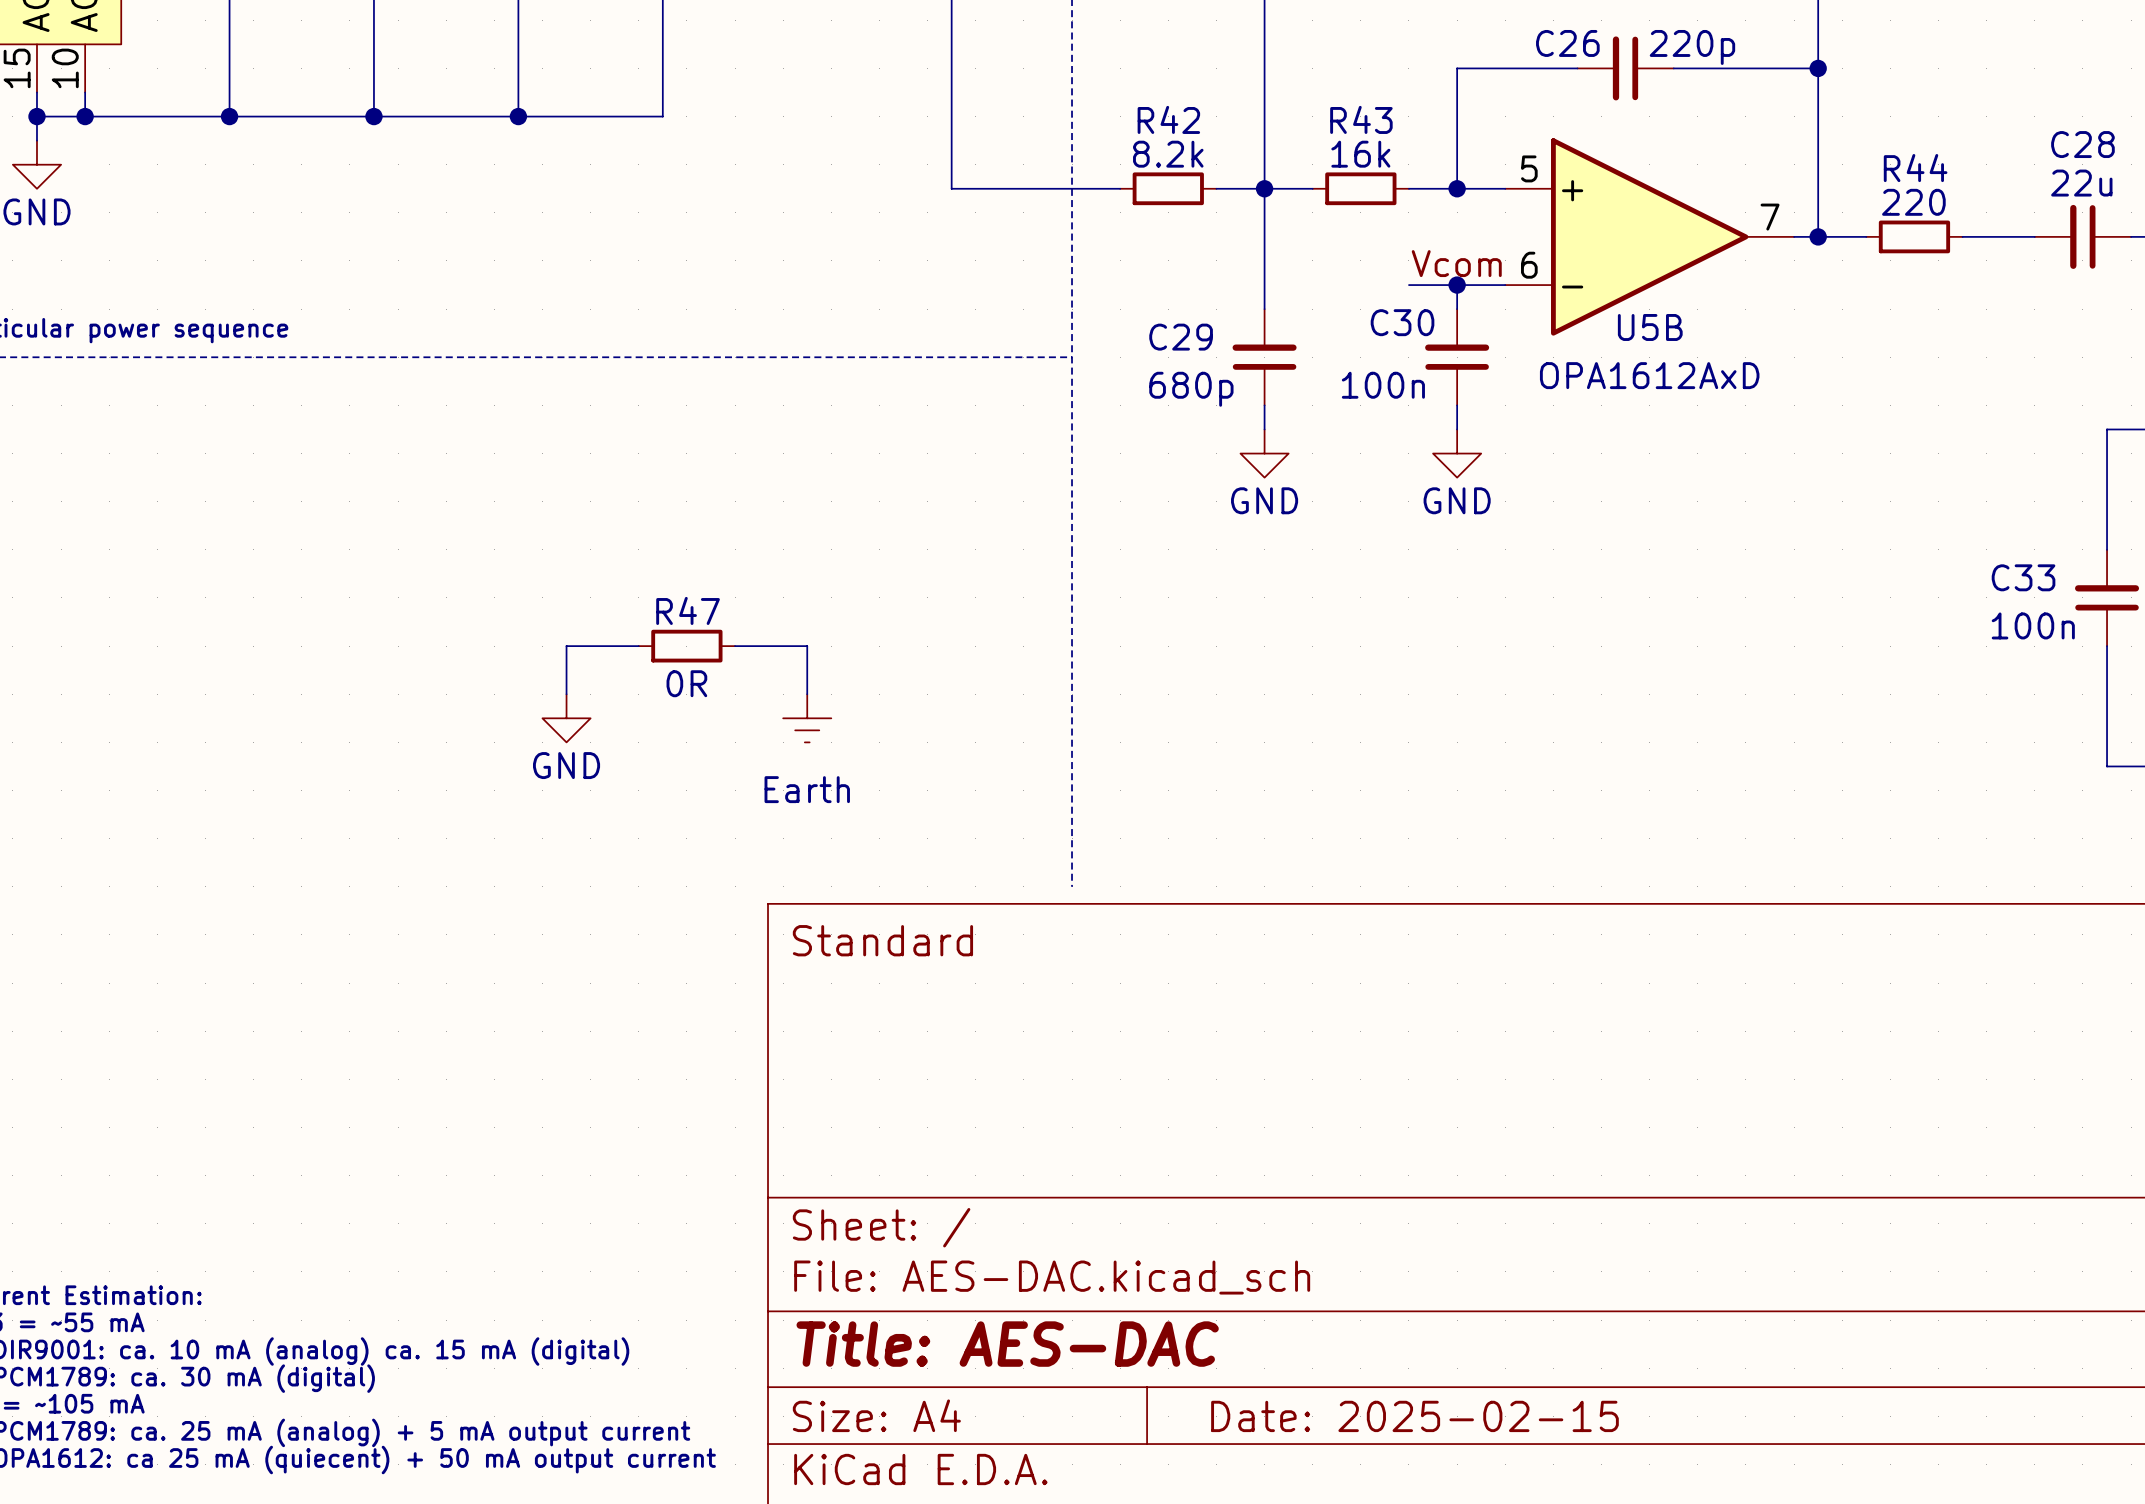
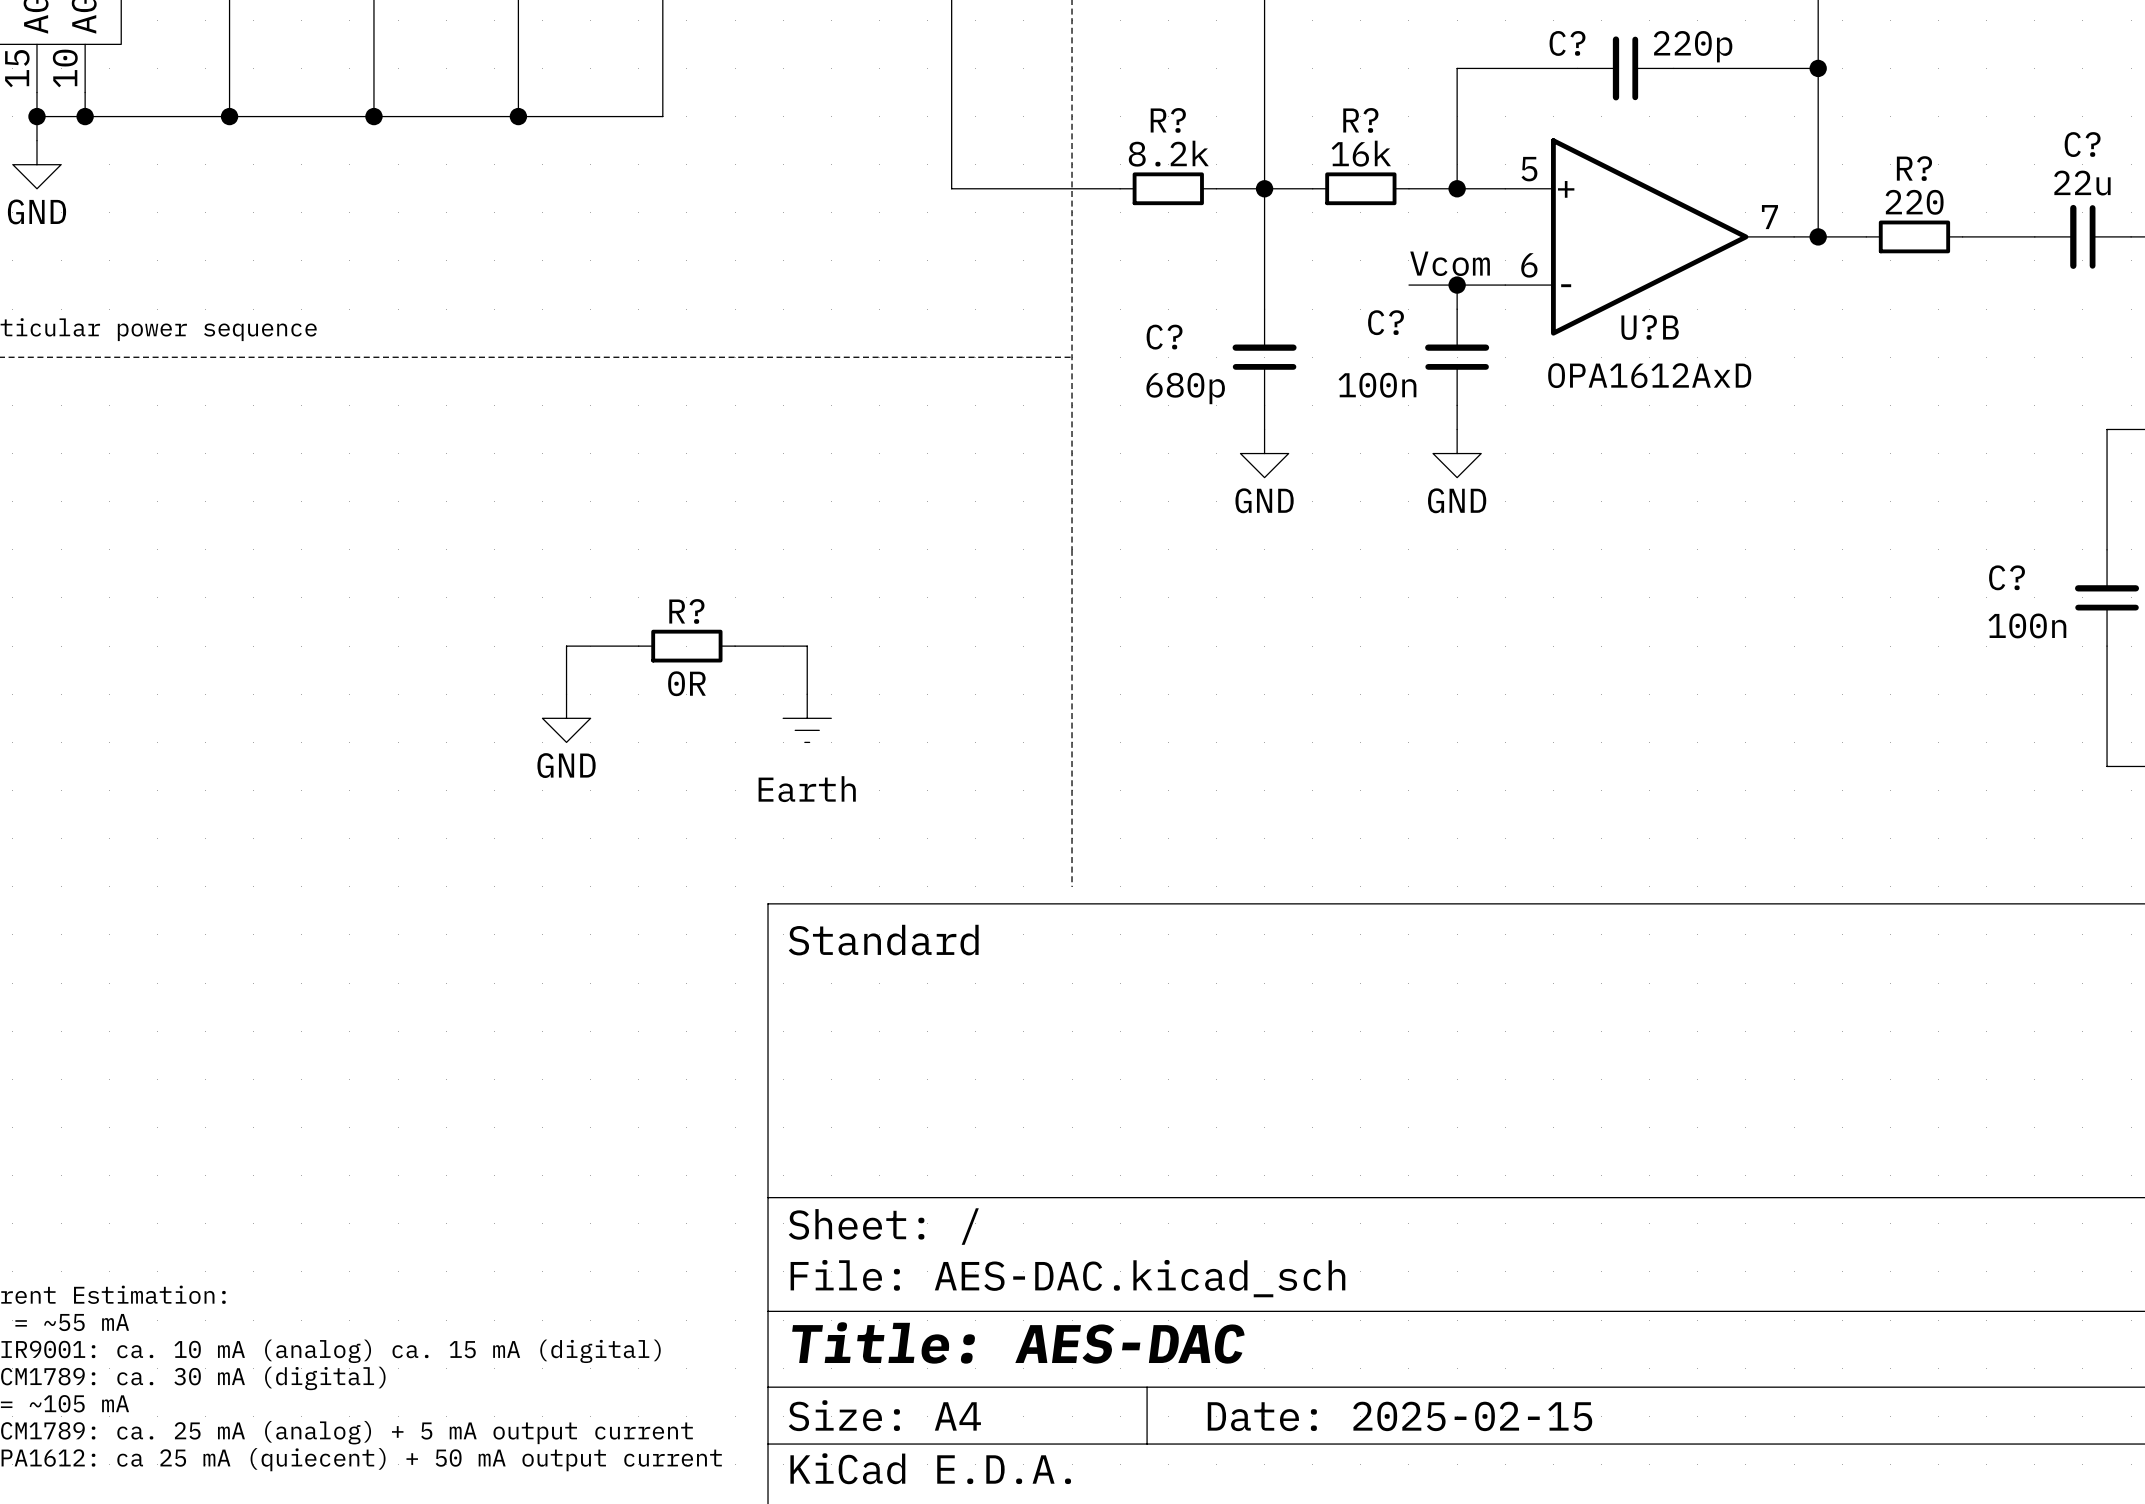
C26 name: C26 (1567, 43) -> C? (1567, 43)
R42 name: R42 (1168, 119) -> R? (1168, 120)
R43 name: R43 (1361, 119) -> R? (1360, 120)
C28 name: C28 (2082, 144) -> C? (2082, 144)
R44 name: R44 (1915, 168) -> R? (1914, 168)
C30 name: C30 (1402, 322) -> C? (1386, 322)
U5B name: U5B (1650, 327) -> U?B (1650, 327)
C29 name: C29 (1181, 337) -> C? (1164, 337)
C33 name: C33 (2023, 577) -> C? (2007, 577)
R47 name: R47 (688, 610) -> R? (686, 611)

